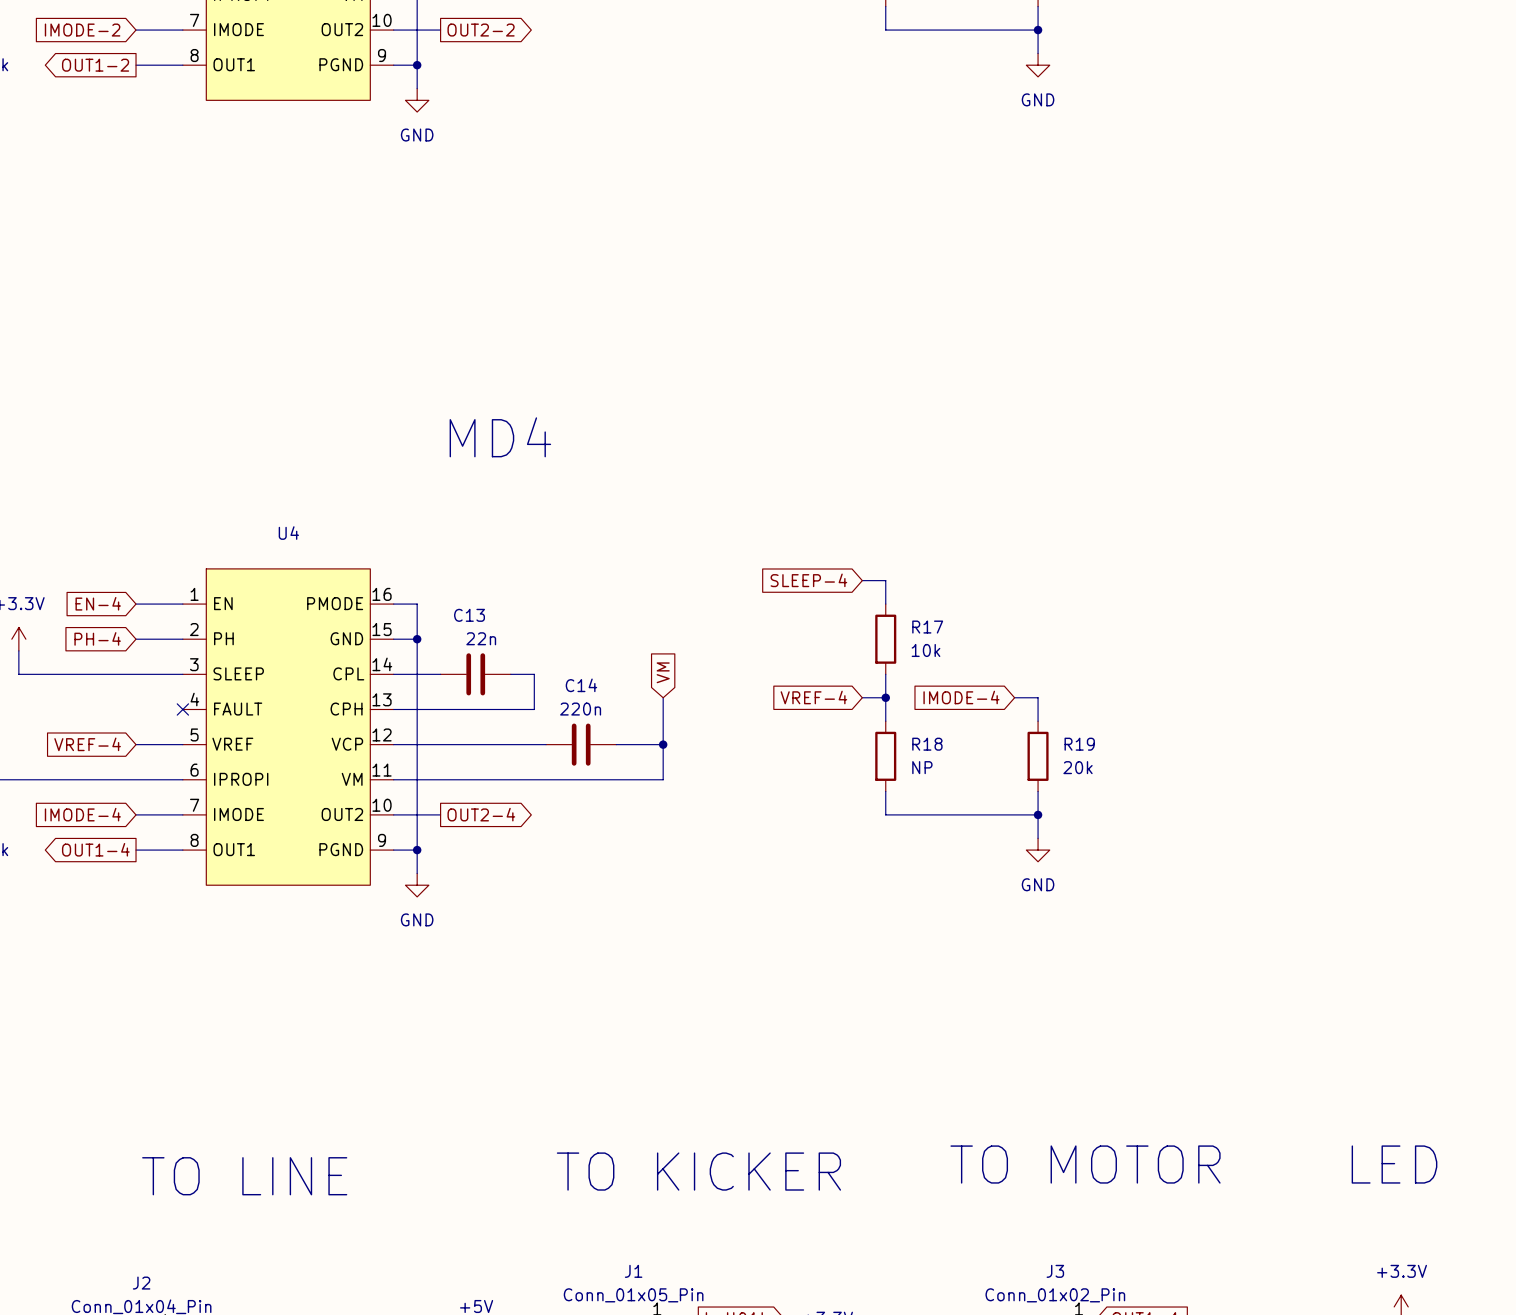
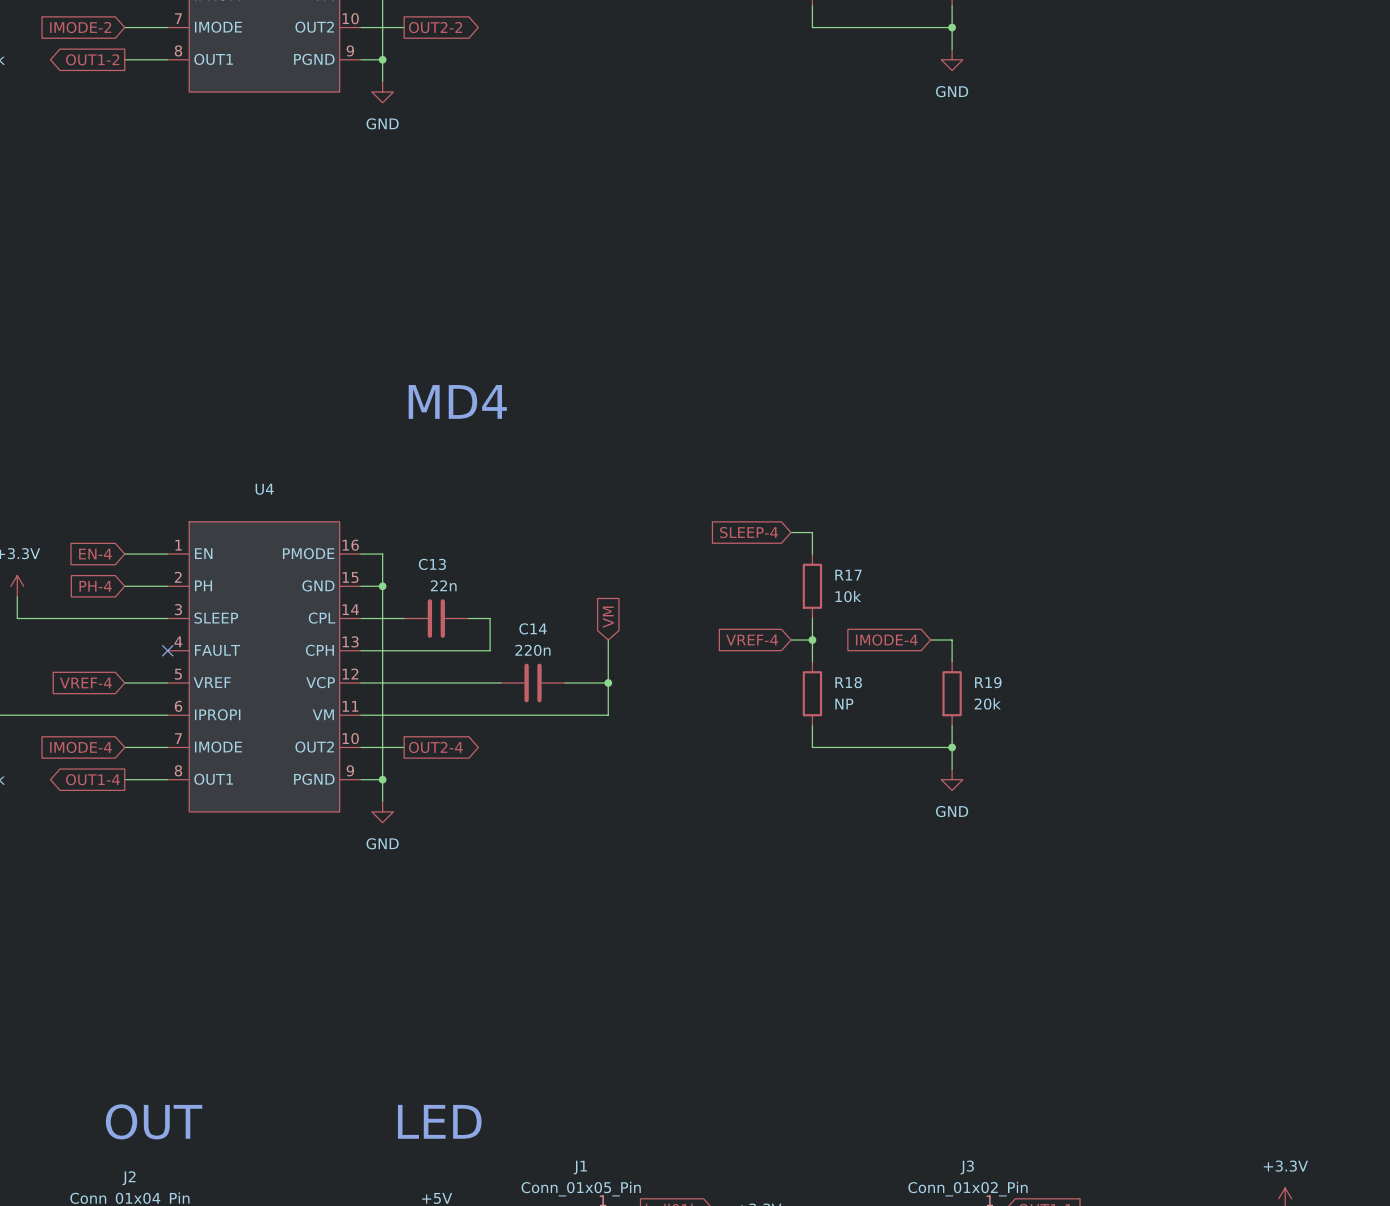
text: TO MOTOR (1085, 1164) -> none
text: LED (1394, 1164) -> none
text: TO KICKER (698, 1171) -> none
text: TO LINE (244, 1176) -> none
text: none -> OUT (154, 1121)
text: none -> LED (439, 1121)

